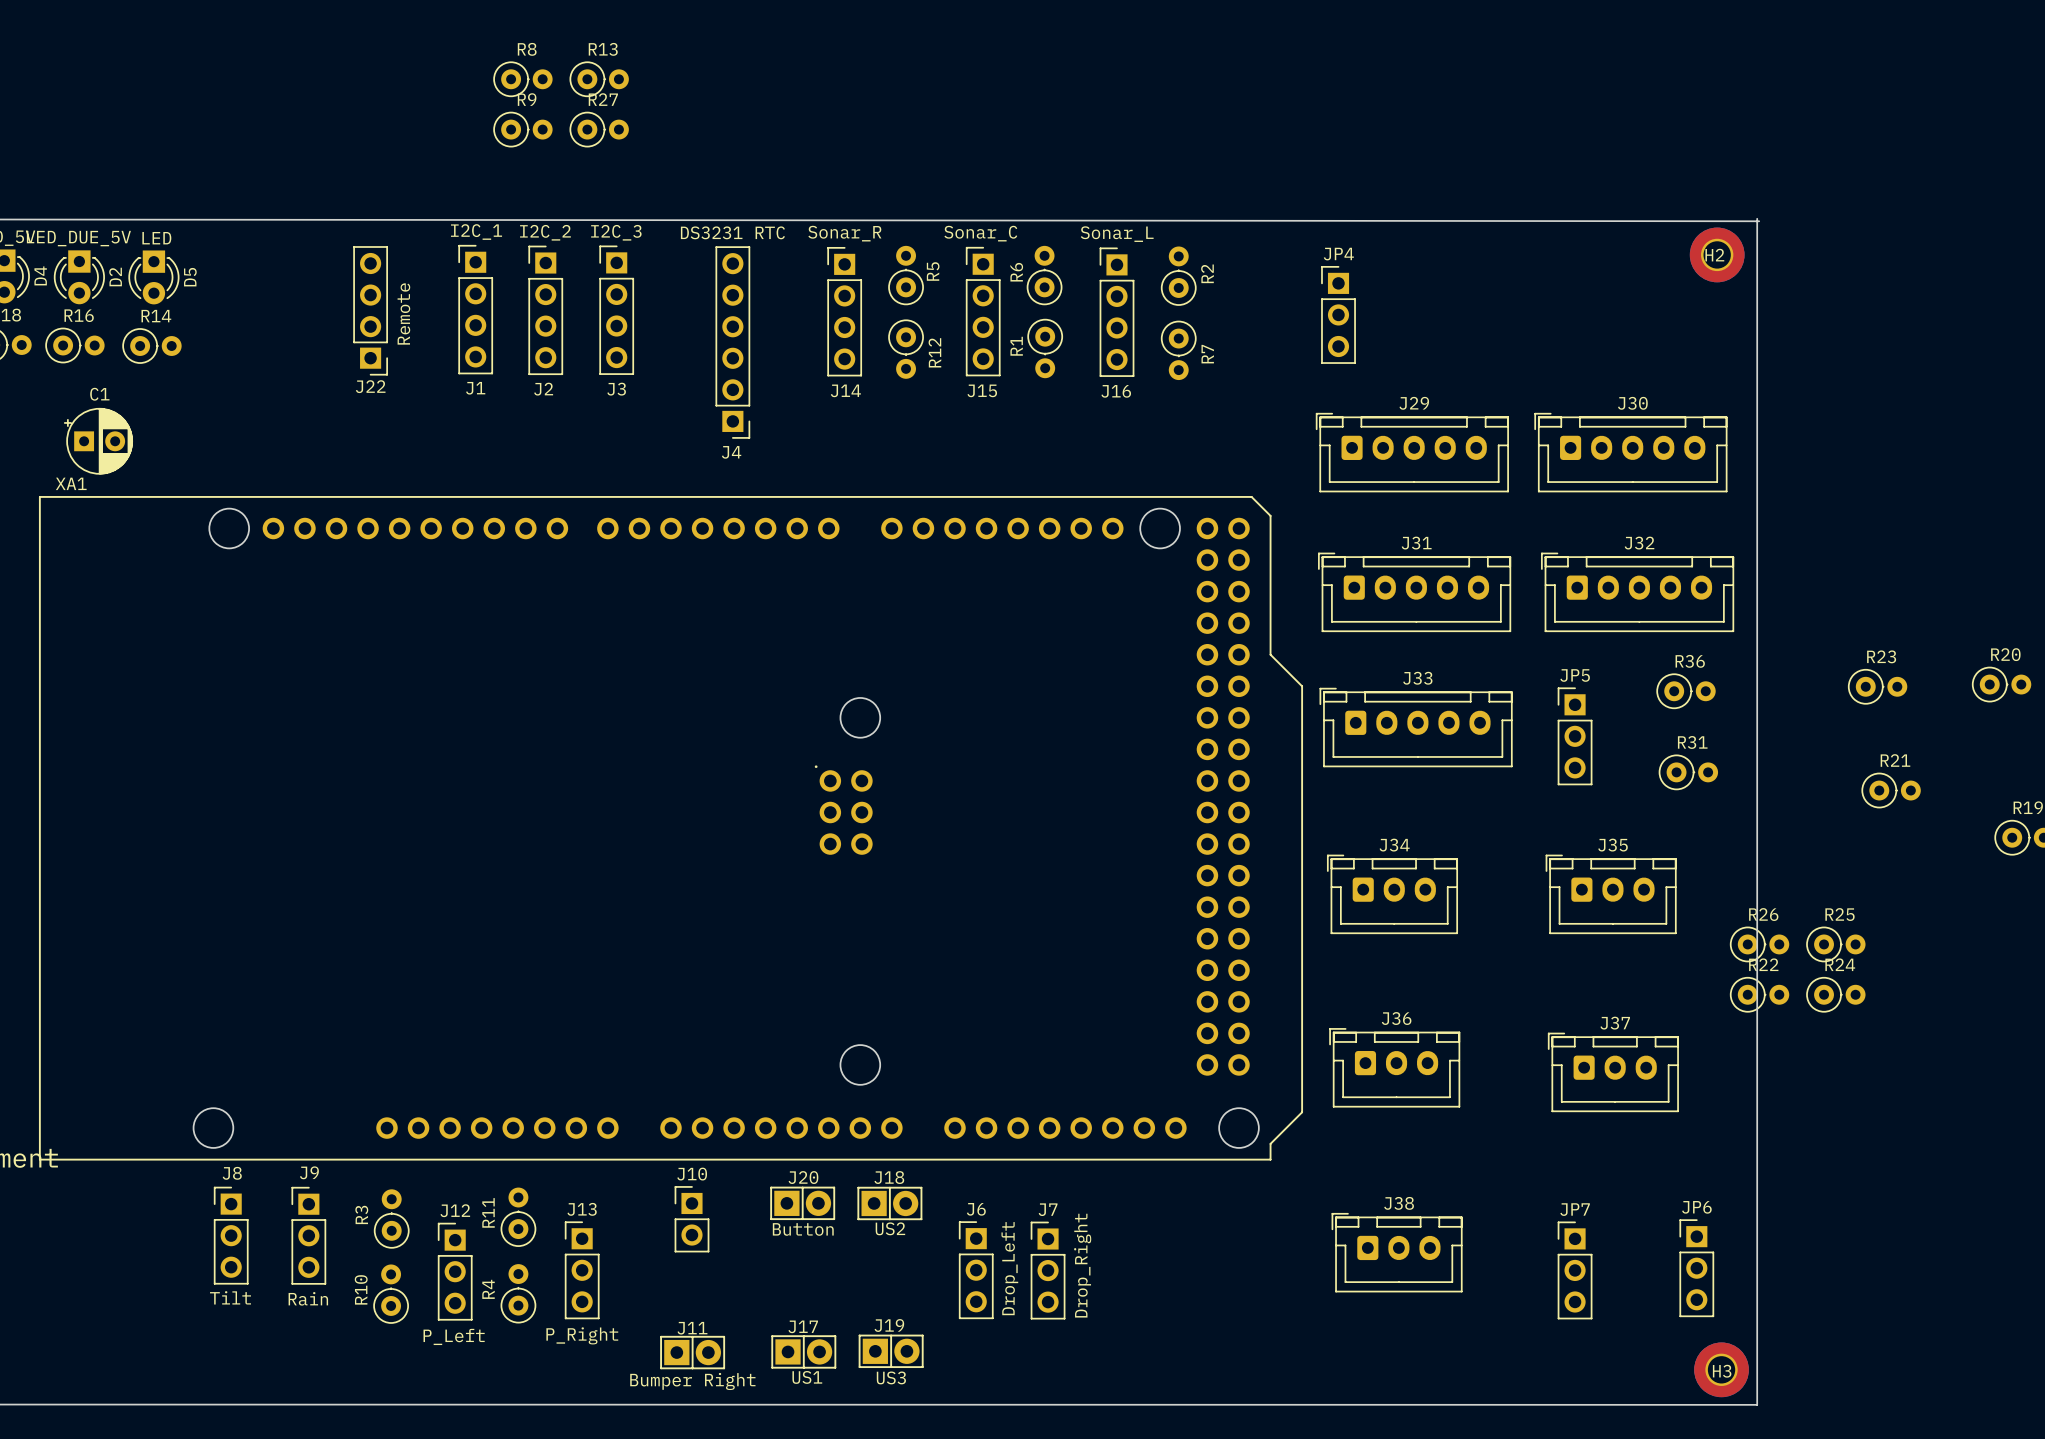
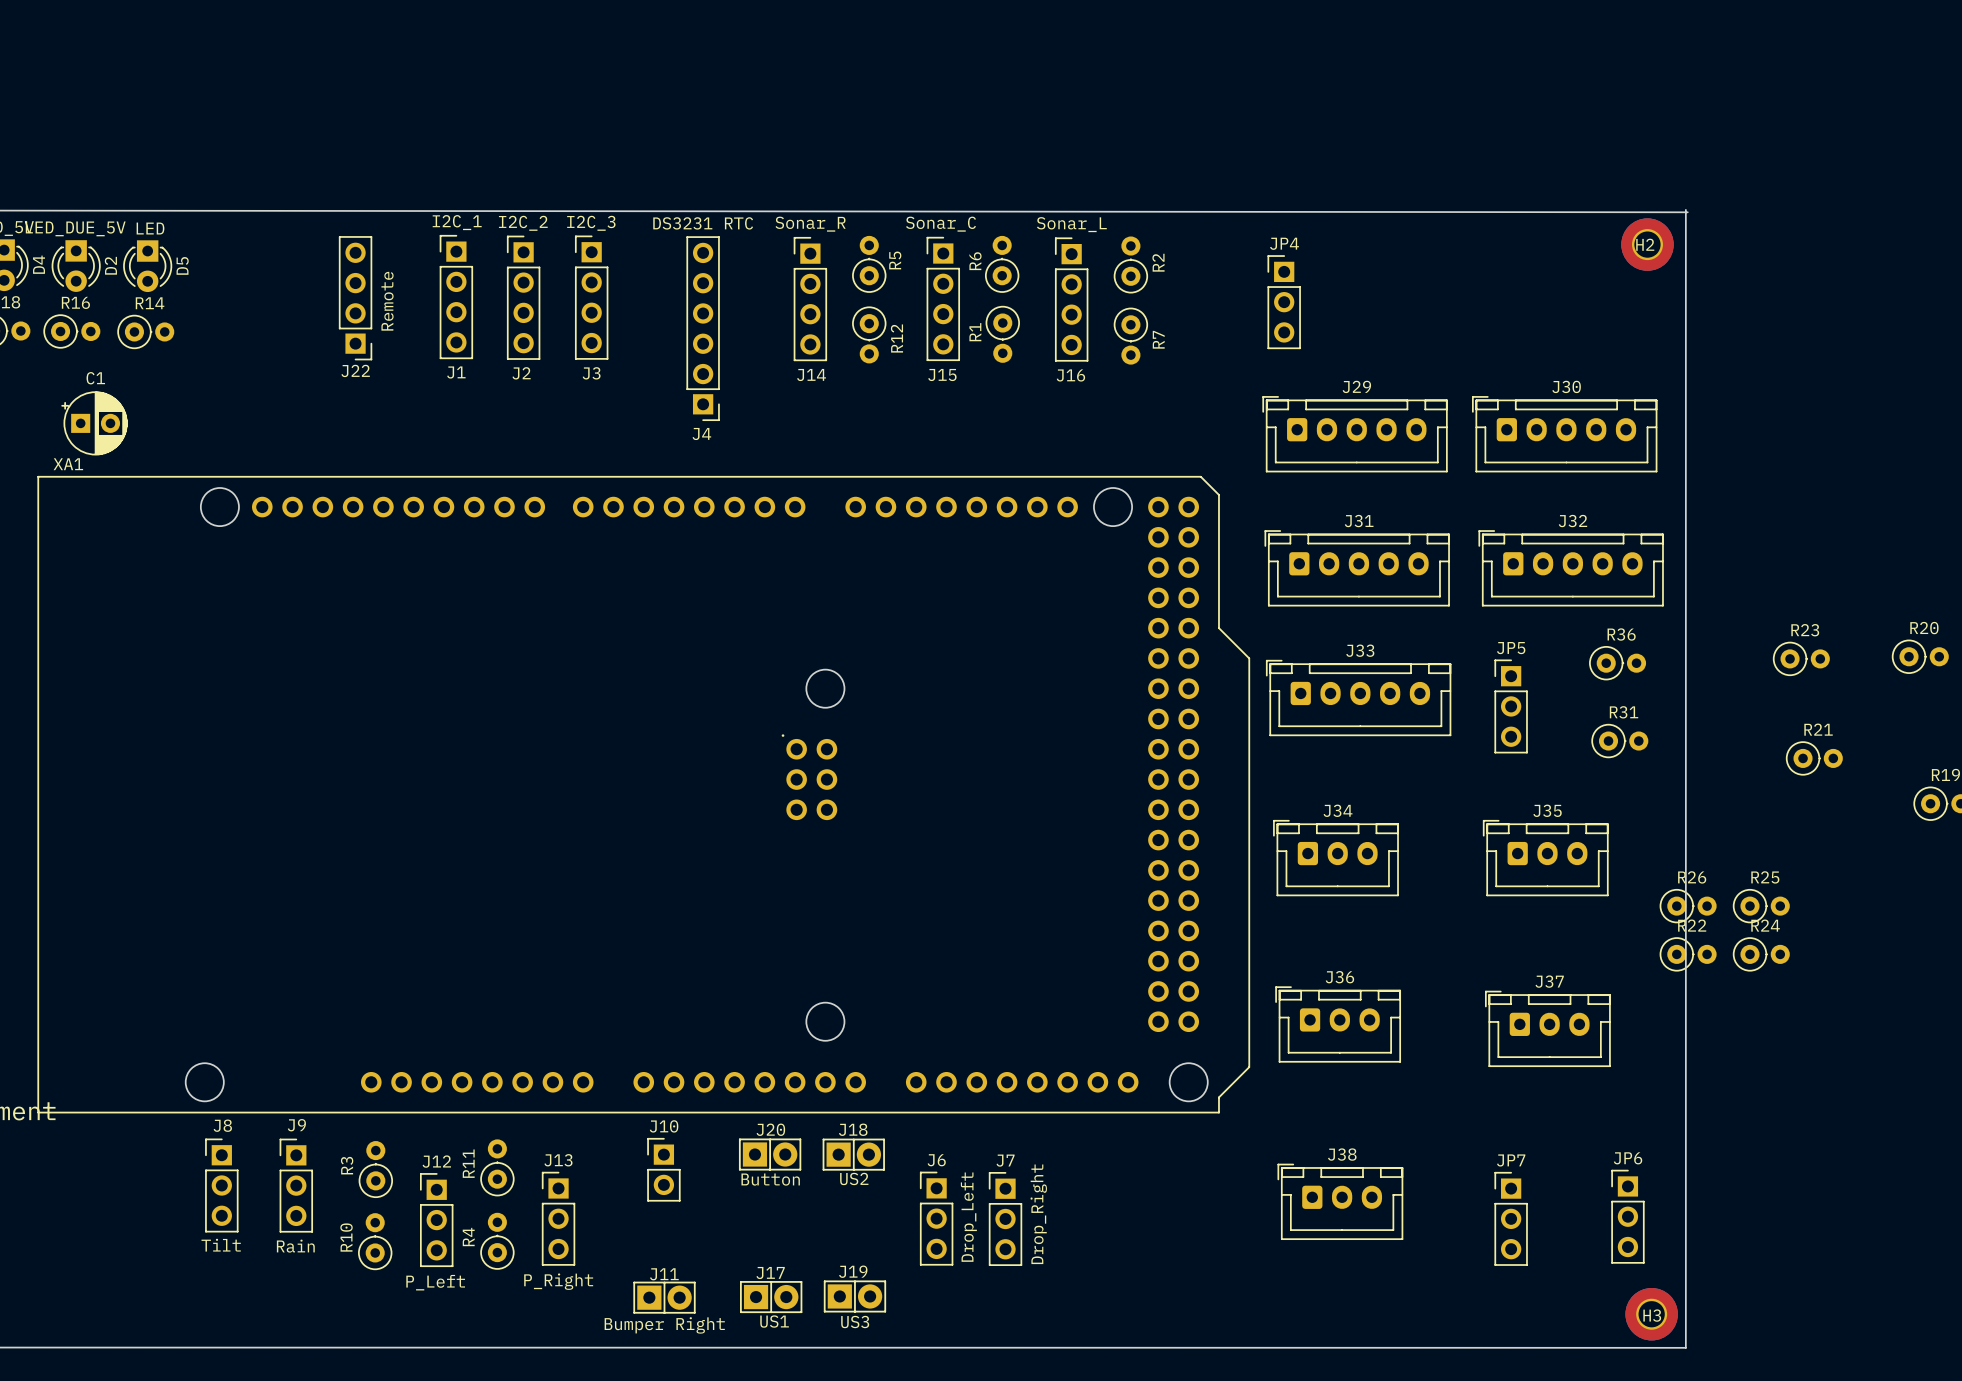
R8: (522, 79) -> none
R13: (599, 79) -> none
R9: (522, 129) -> none
R27: (599, 129) -> none

